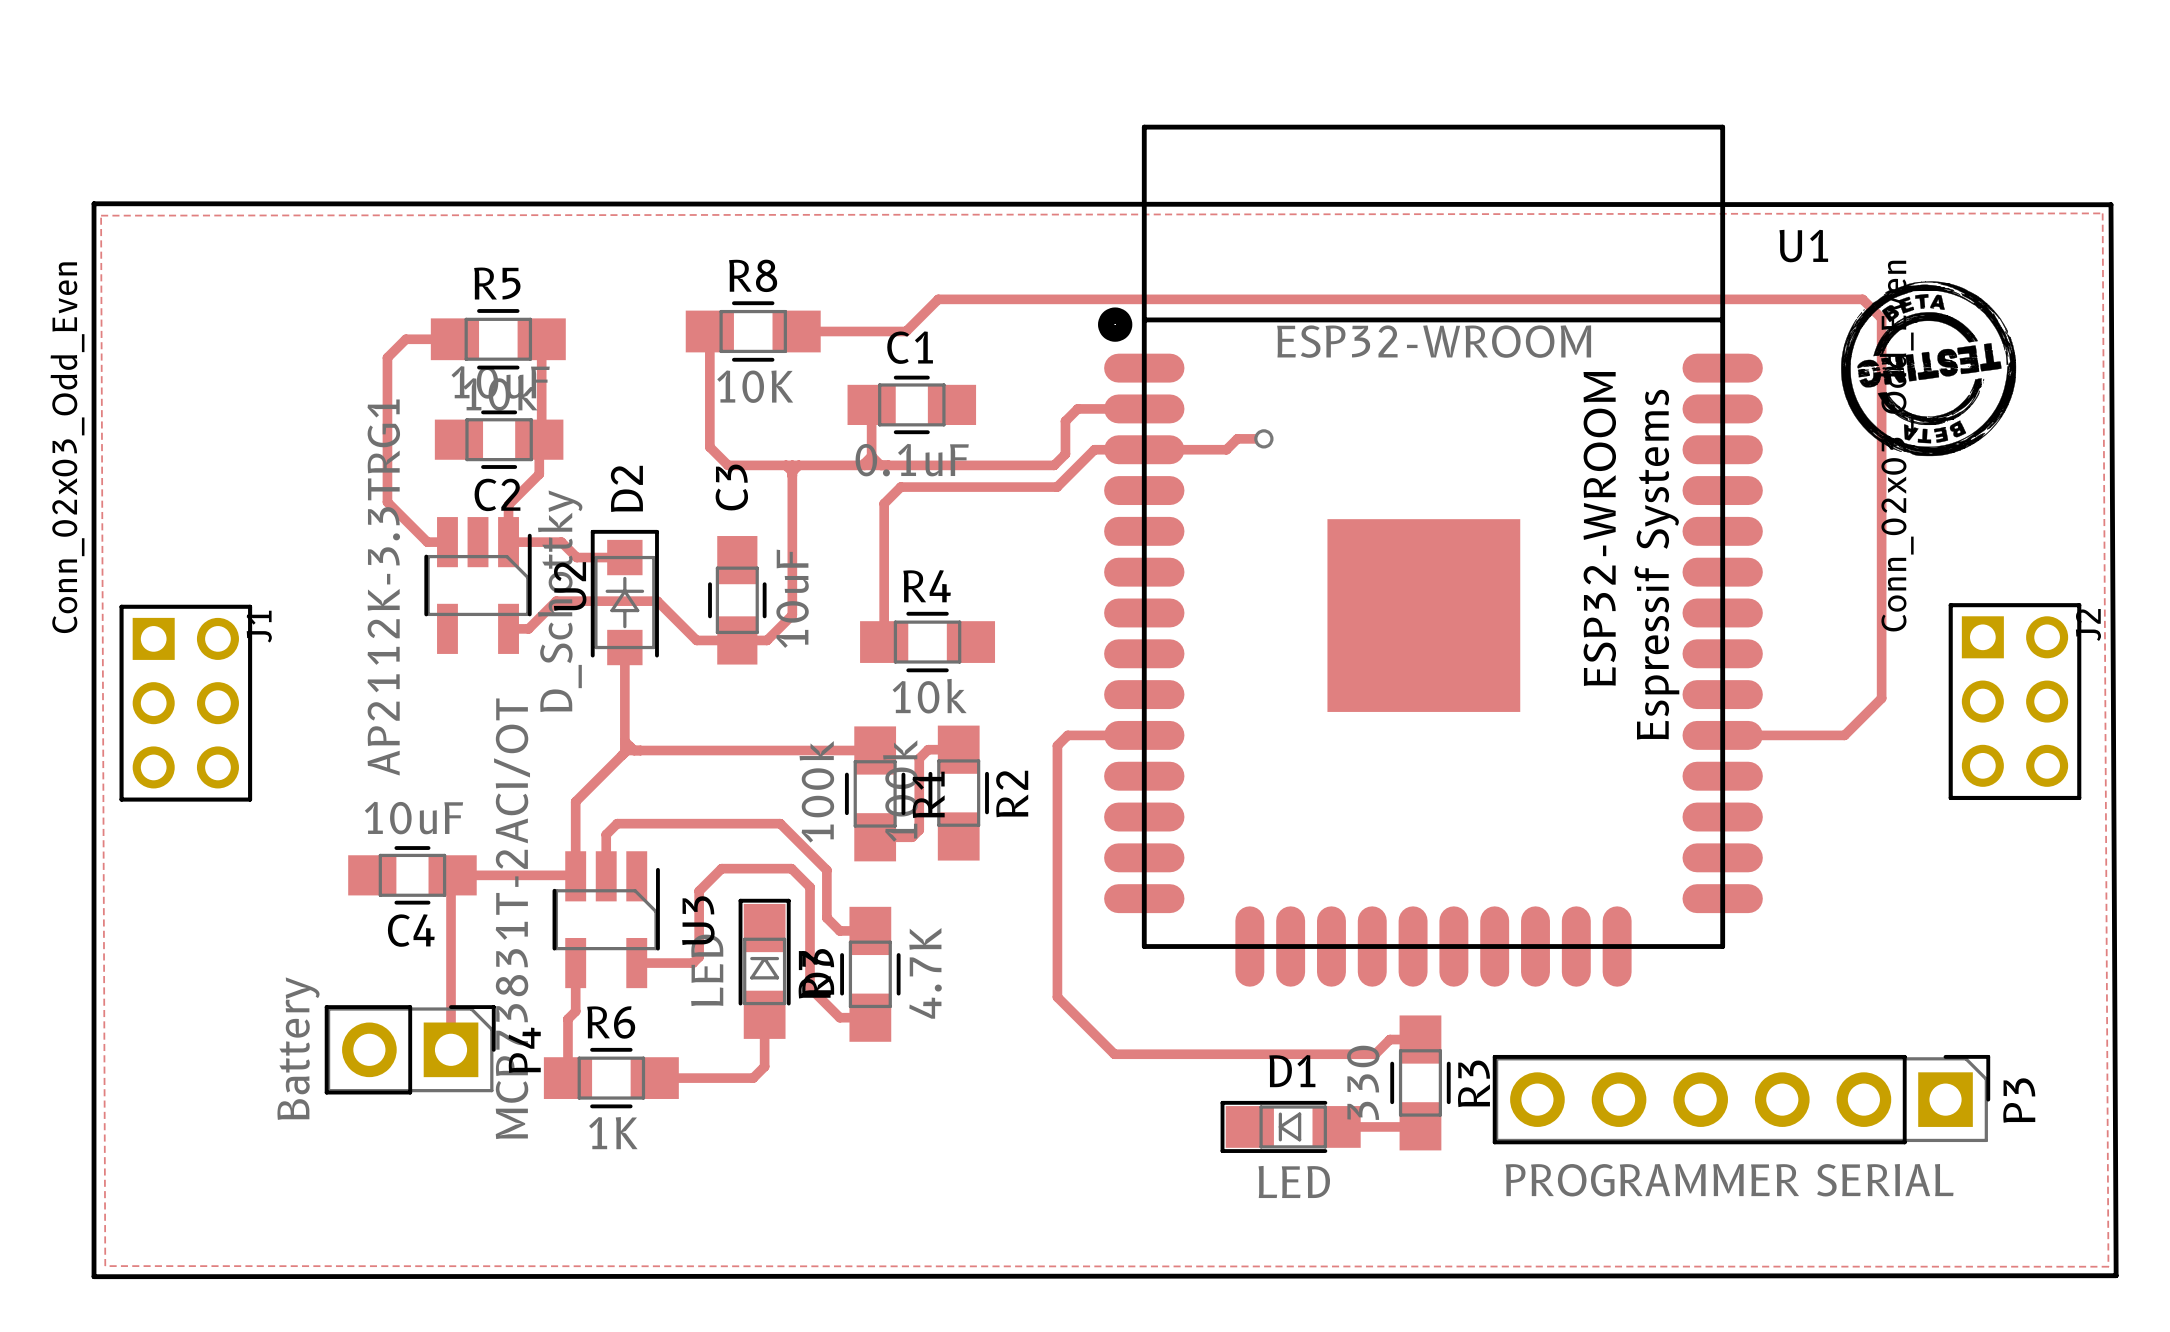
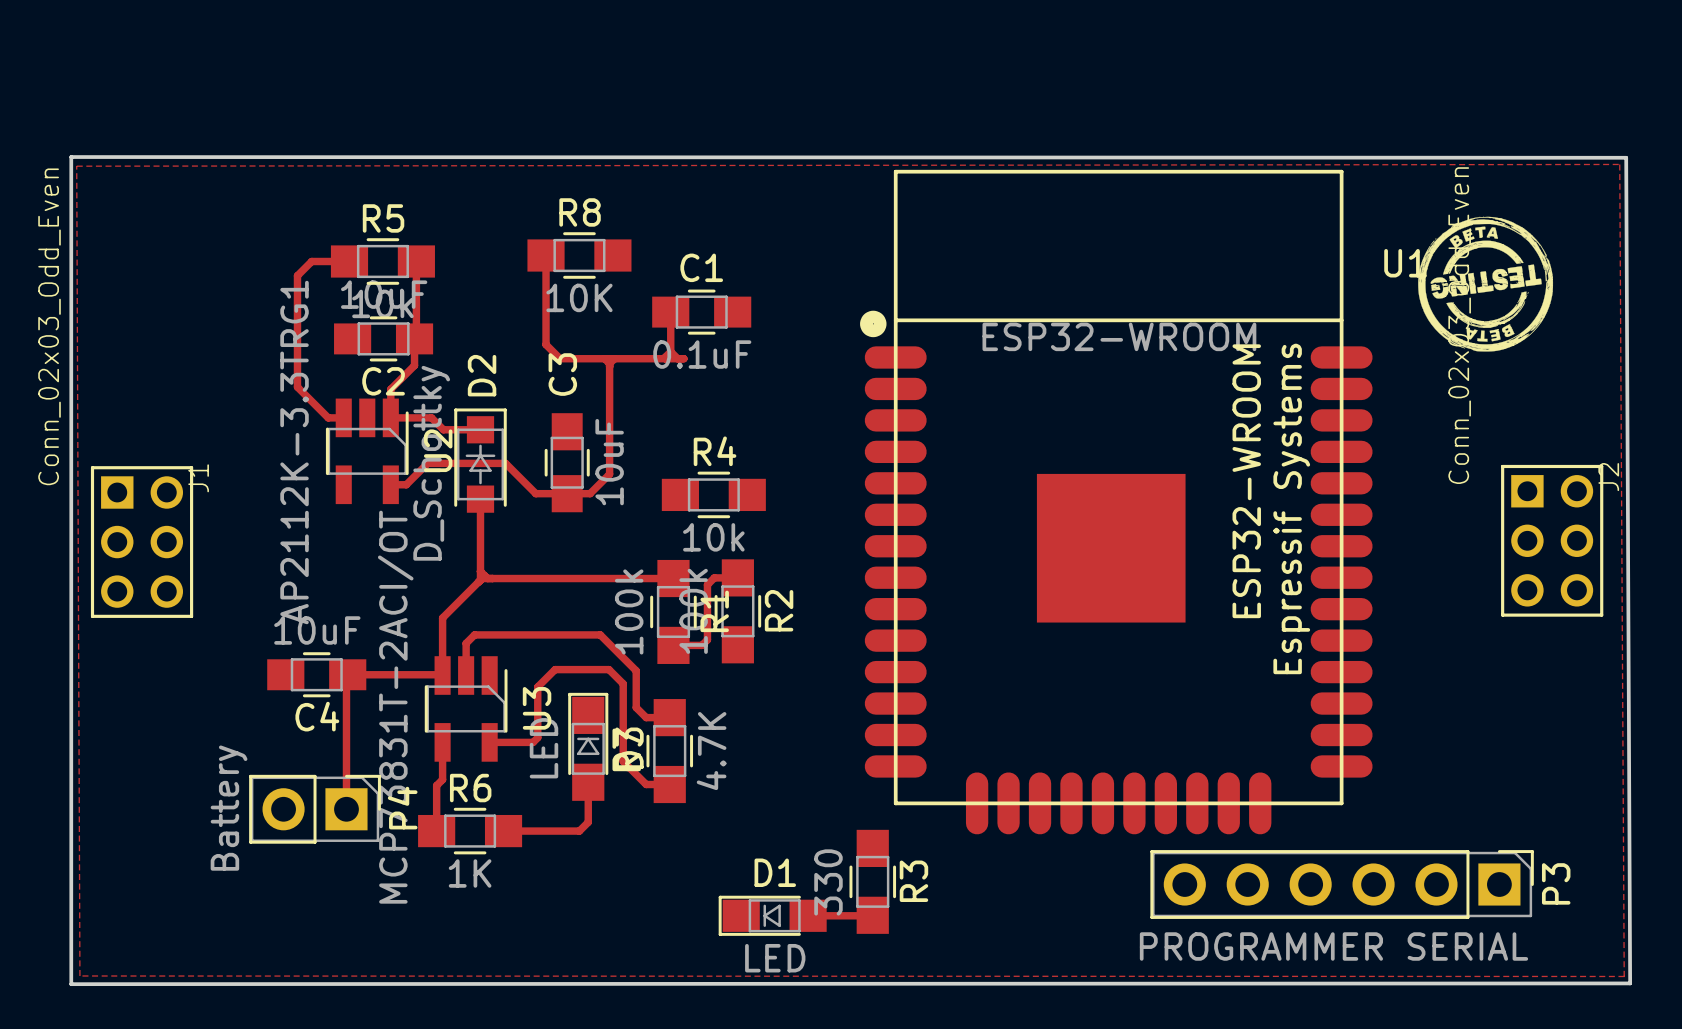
track: (796, 331) (906, 331) (938, 299) (1862, 299) (1881, 318) (1881, 698) (1844, 735) (1722, 735) -> none
track: (1144, 408) (1077, 408) (1065, 421) (1065, 454) (1054, 465) (888, 465) -> none
track: (1263, 438) (1237, 438) (1226, 449) (1094, 449) (1057, 487) (900, 487) (884, 503) (884, 642) -> none
via: (1263, 438) -> none
U1 position: (1430, 555) -> (1116, 502)
track: (1144, 735) (1067, 735) (1057, 745) (1057, 997) (1114, 1054) (1375, 1054) (1389, 1039) (1420, 1039) -> none
R3 position: (1420, 1082) -> (872, 881)
P3 position: (1741, 1099) -> (1342, 884)
D1 position: (1290, 1126) -> (772, 915)
track: (1337, 1126) (1420, 1126) -> (808, 915) (872, 915)

